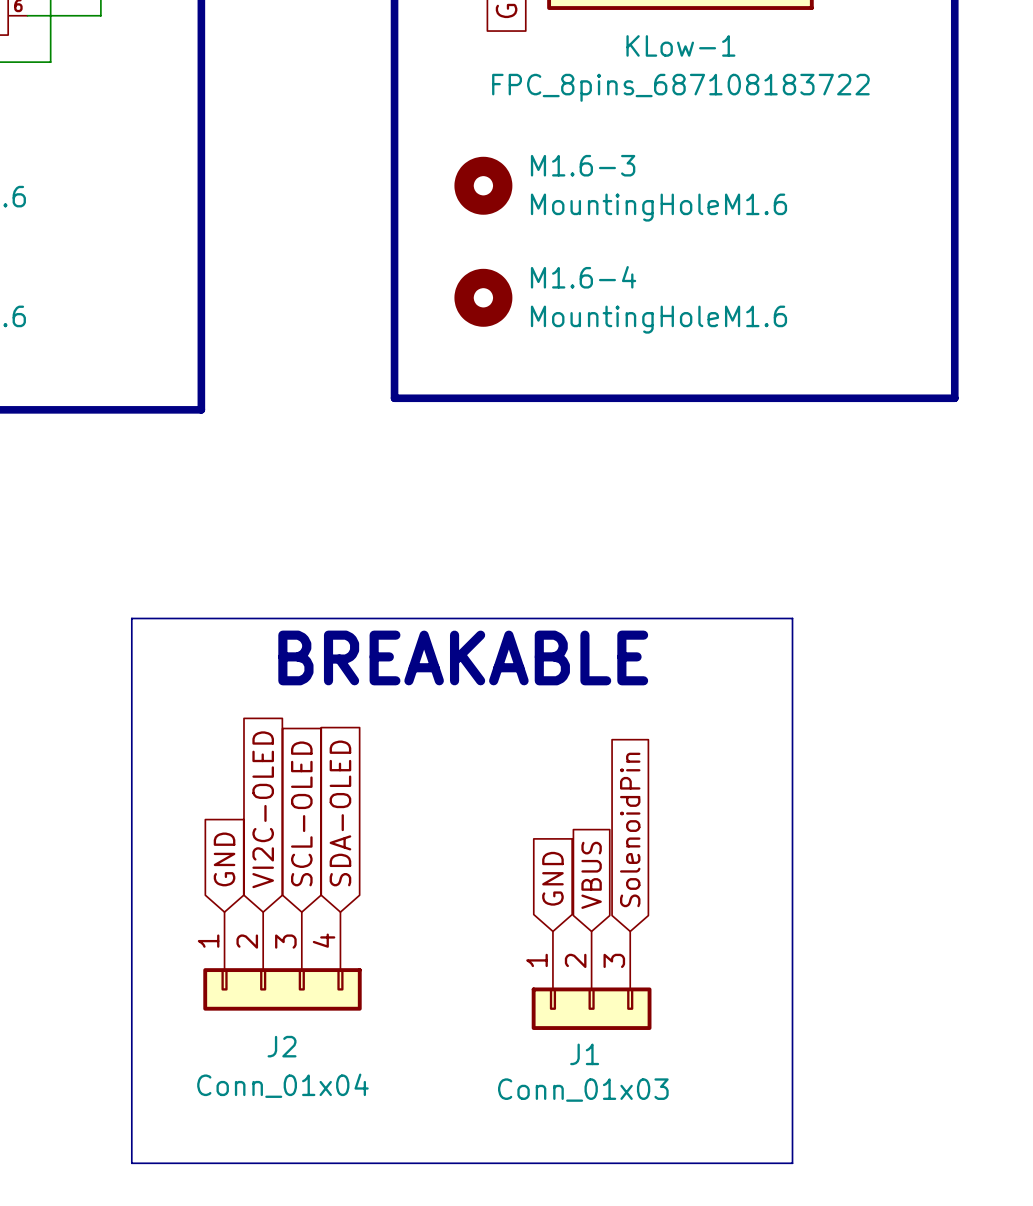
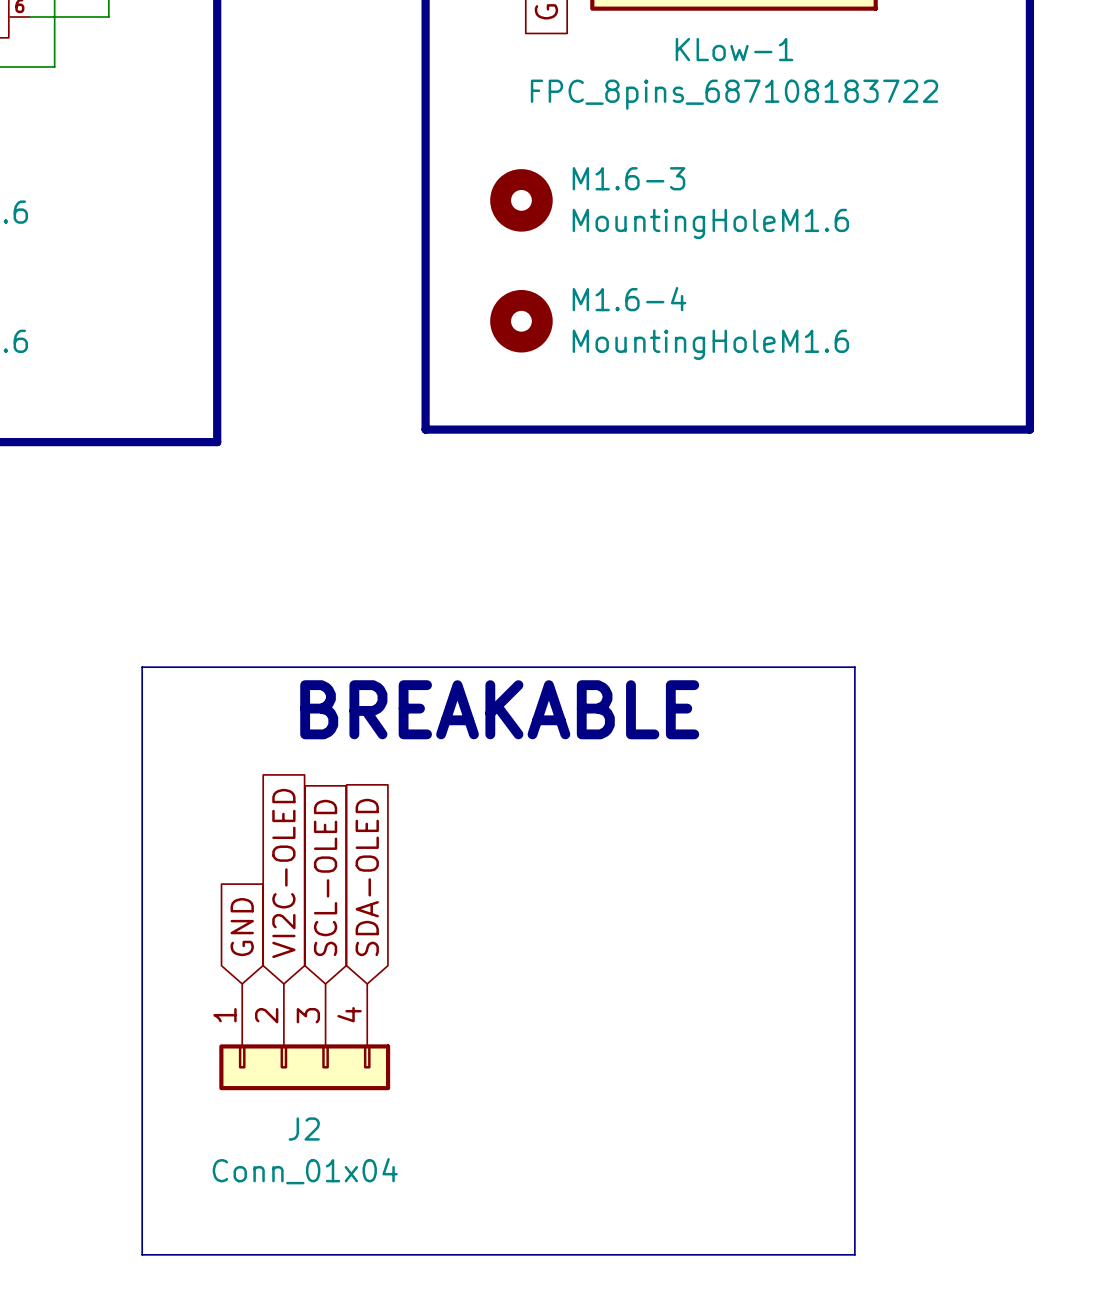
global label: SolenoidPin (630, 829) -> none
global label: VBUS (591, 875) -> none
global label: GND (552, 878) -> none
J1: Conn_01x03 (591, 980) -> none

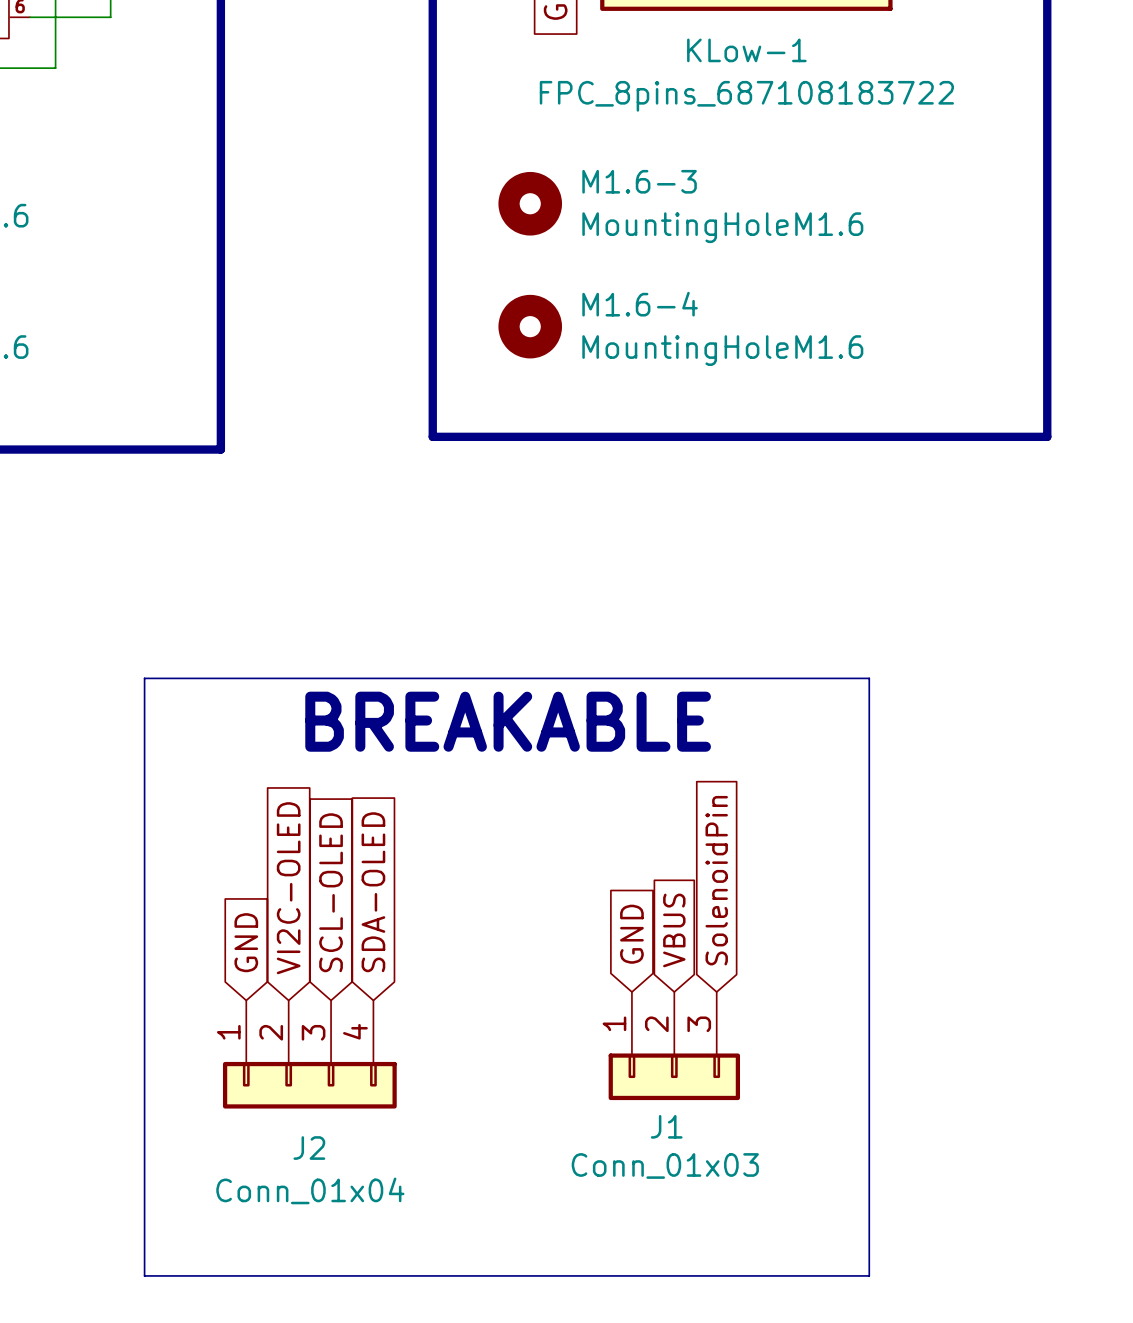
global label: none -> SolenoidPin (716, 880)
global label: none -> VBUS (674, 930)
global label: none -> GND (631, 934)
J1: none -> Conn_01x03 (674, 1046)

